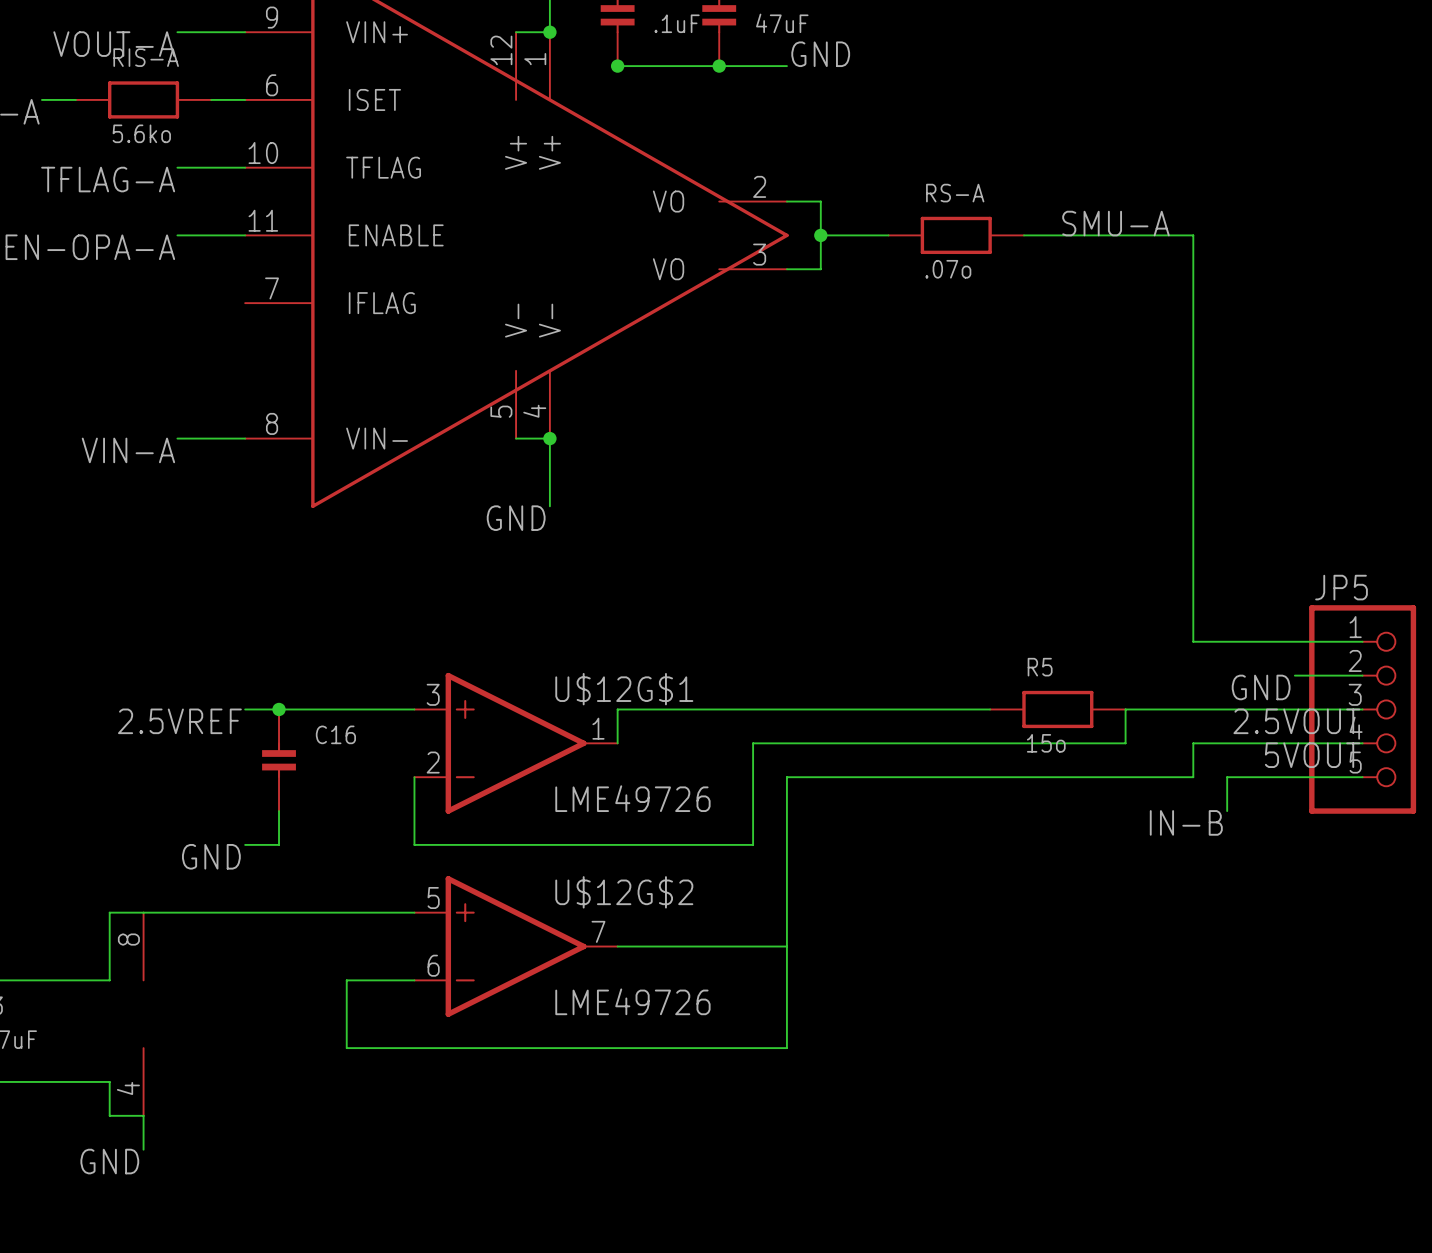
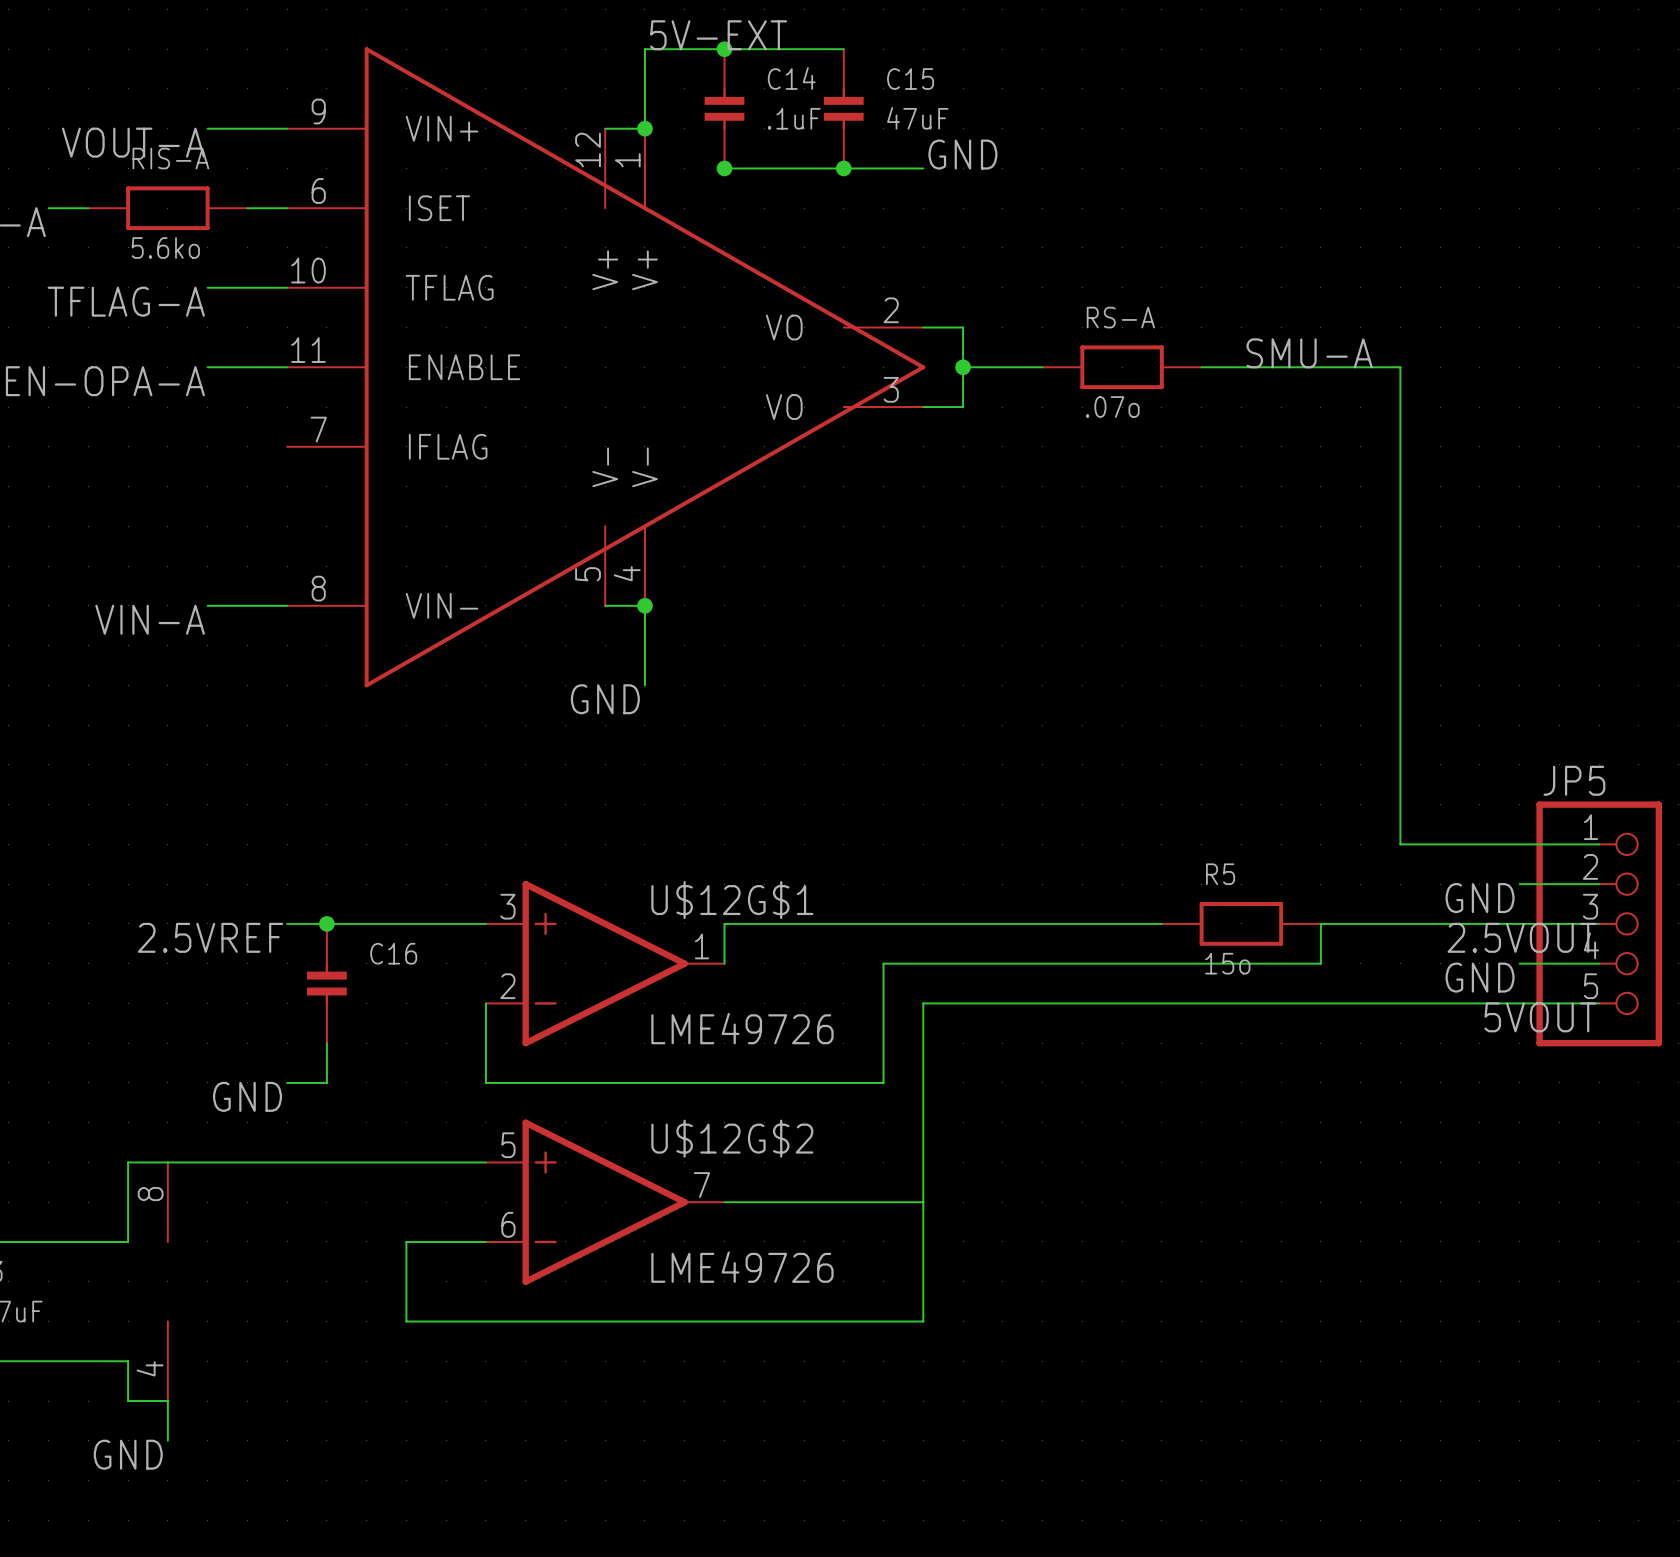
wire: (1294, 743) (1193, 743) (1193, 777) -> none
label: none -> GND (1480, 977)
label position: 5VOUT (1312, 755) -> 5VOUT (1540, 1017)
wire: (1227, 777) (1227, 811) -> (1440, 1003) (1400, 1003)
label: IN-B (1186, 822) -> none

